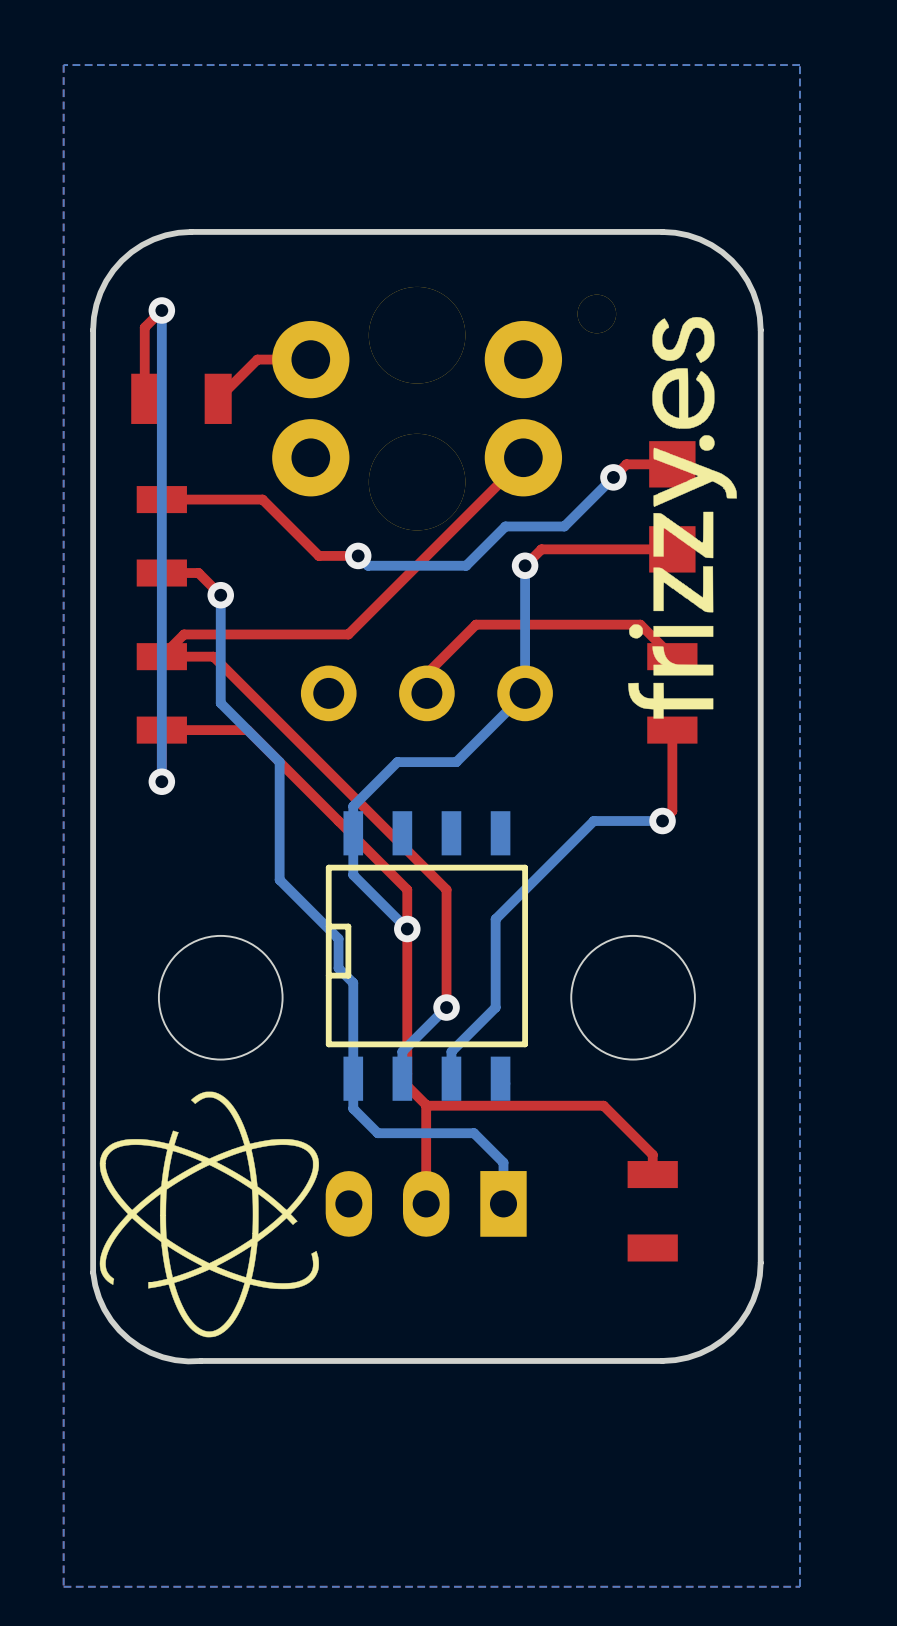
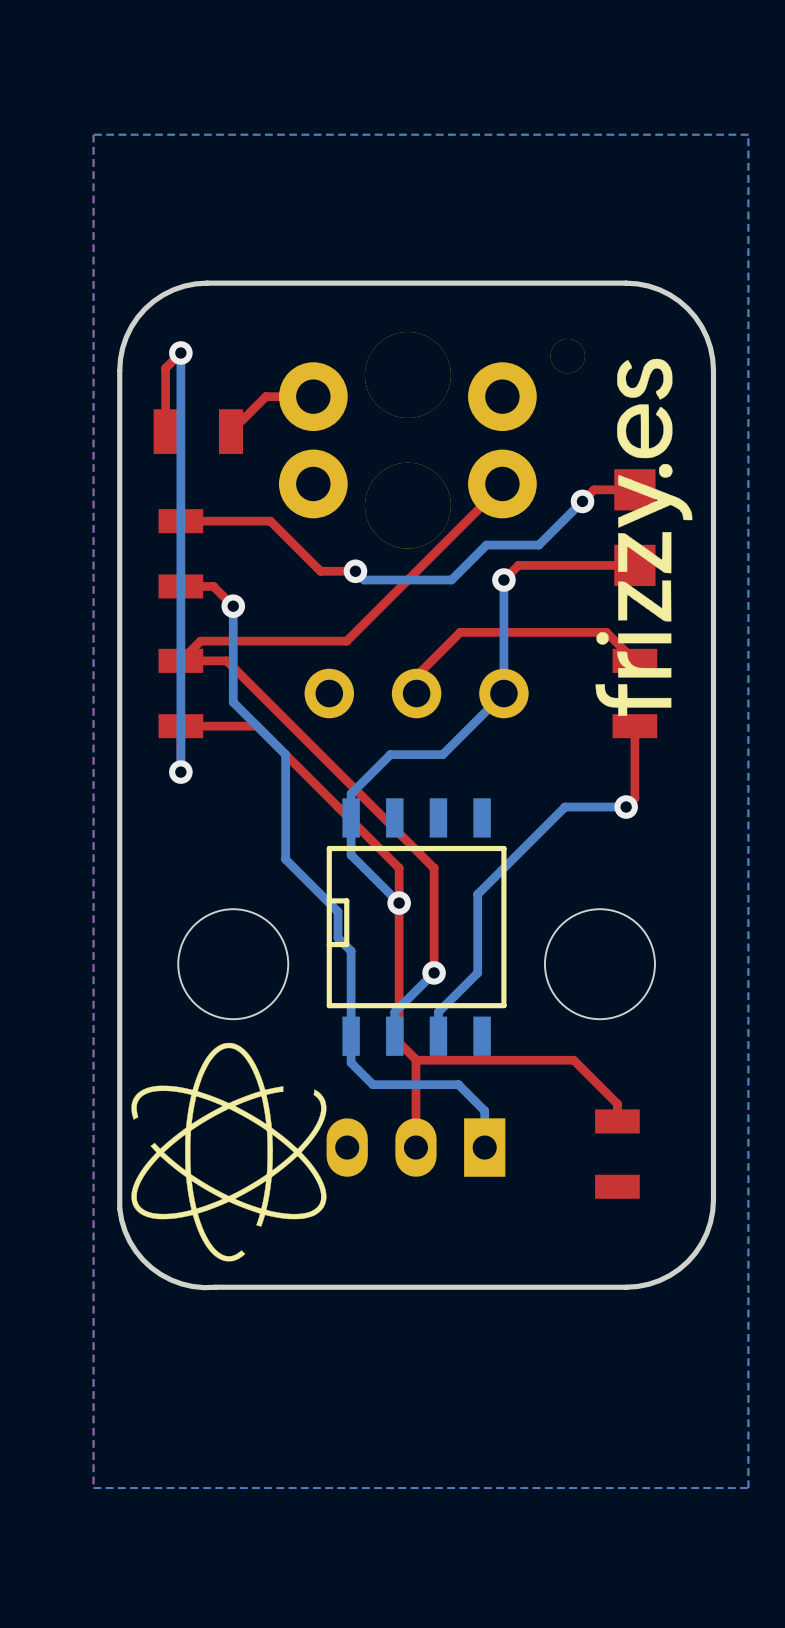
drawing shape: [99, 1091, 319, 1338] -> [131, 1042, 327, 1262]

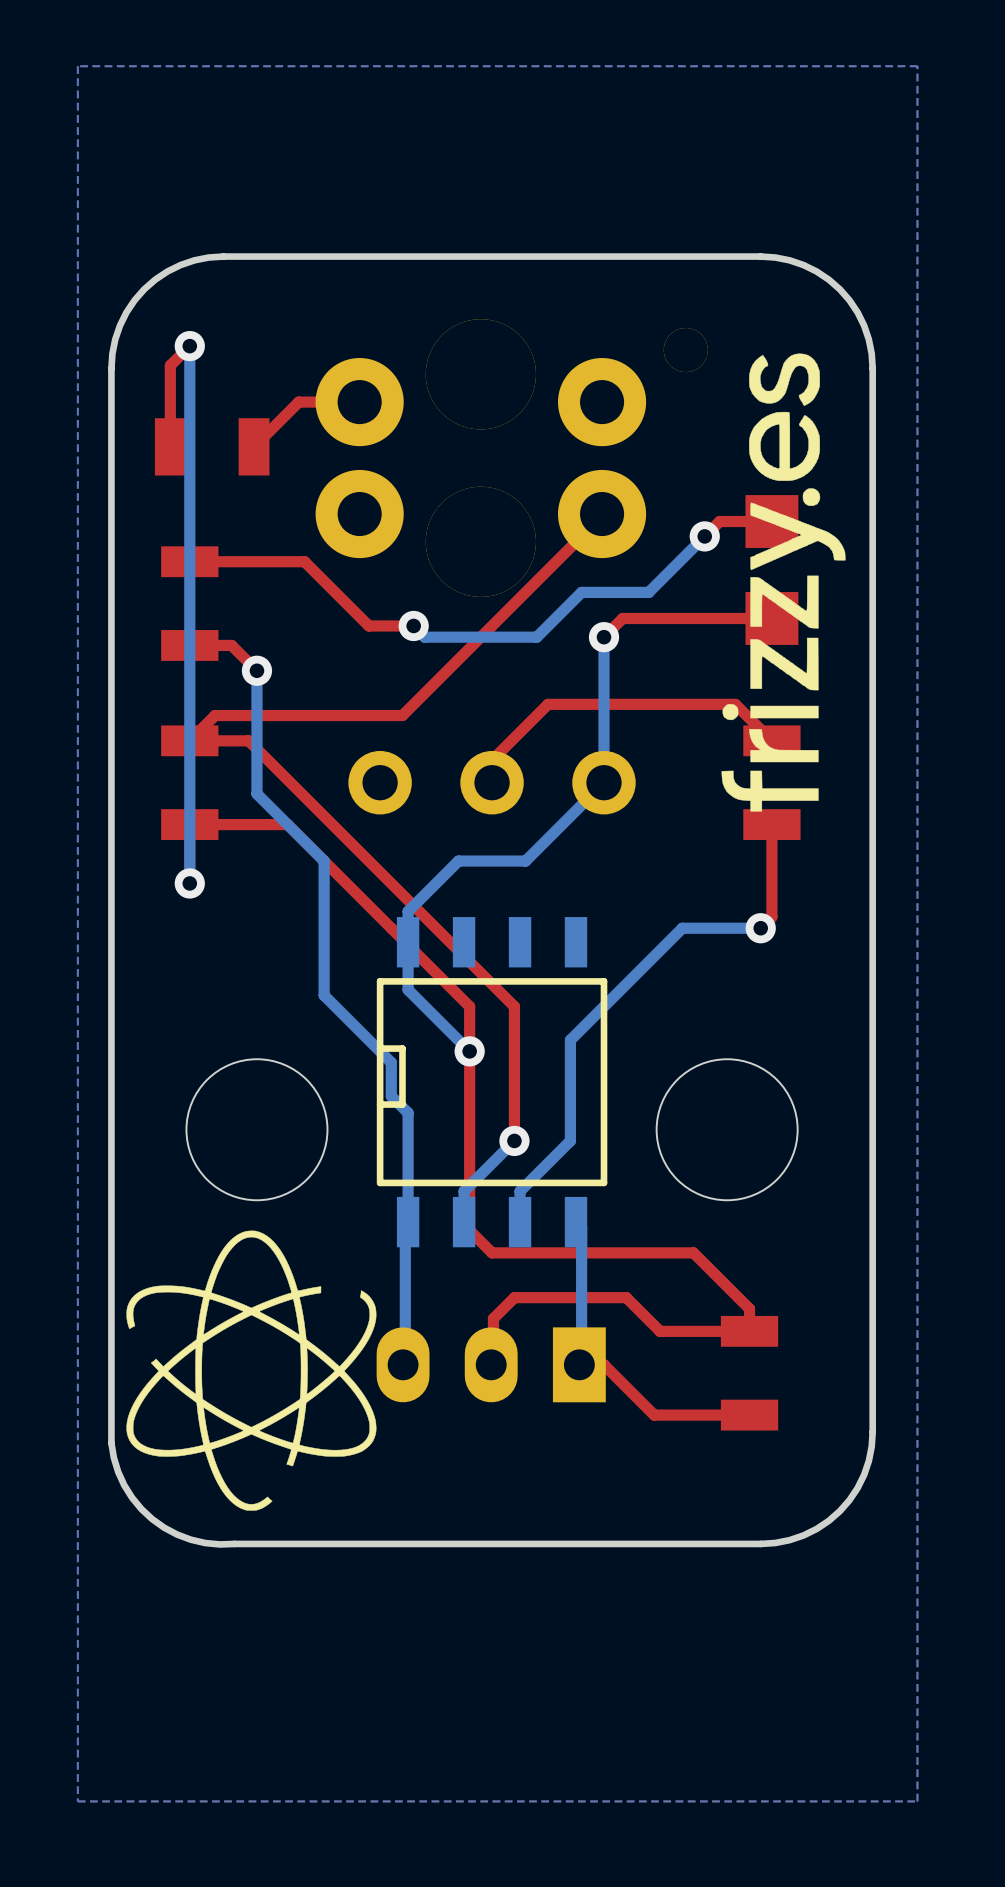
bottom track: (351, 1036) (351, 1062) (372, 1084) (458, 1084) (484, 1110) (484, 1147) -> none
bottom track: none -> (405, 1224) (405, 1364)
bottom track: none -> (581, 1227) (581, 1364)
top track: (415, 1059) (415, 1147) -> none
top track: none -> (749, 1331) (660, 1331) (626, 1297) (514, 1297) (493, 1318) (493, 1364)
top track: none -> (581, 1364) (604, 1364) (654, 1415) (749, 1415)

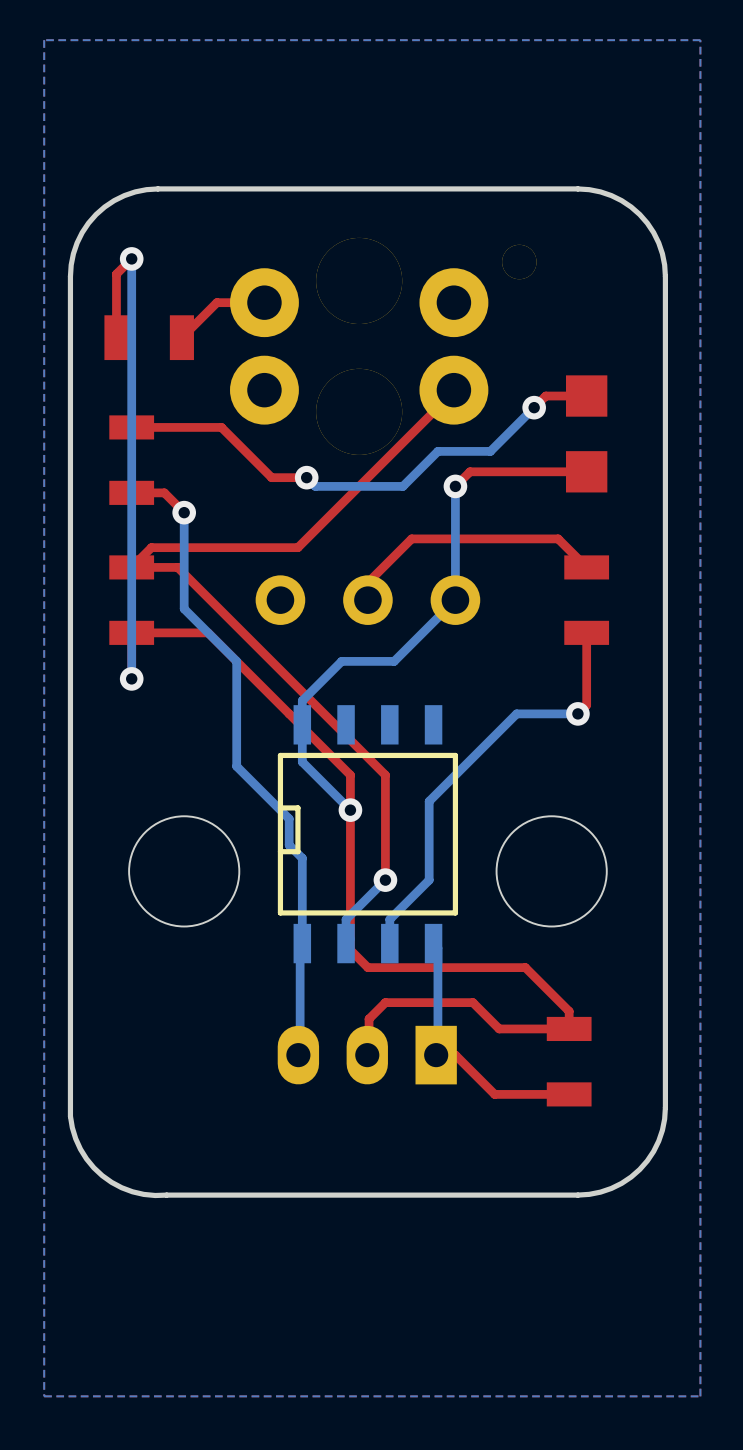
drawing: [721, 353, 846, 812] -> none
drawing: [126, 1230, 377, 1511] -> none

